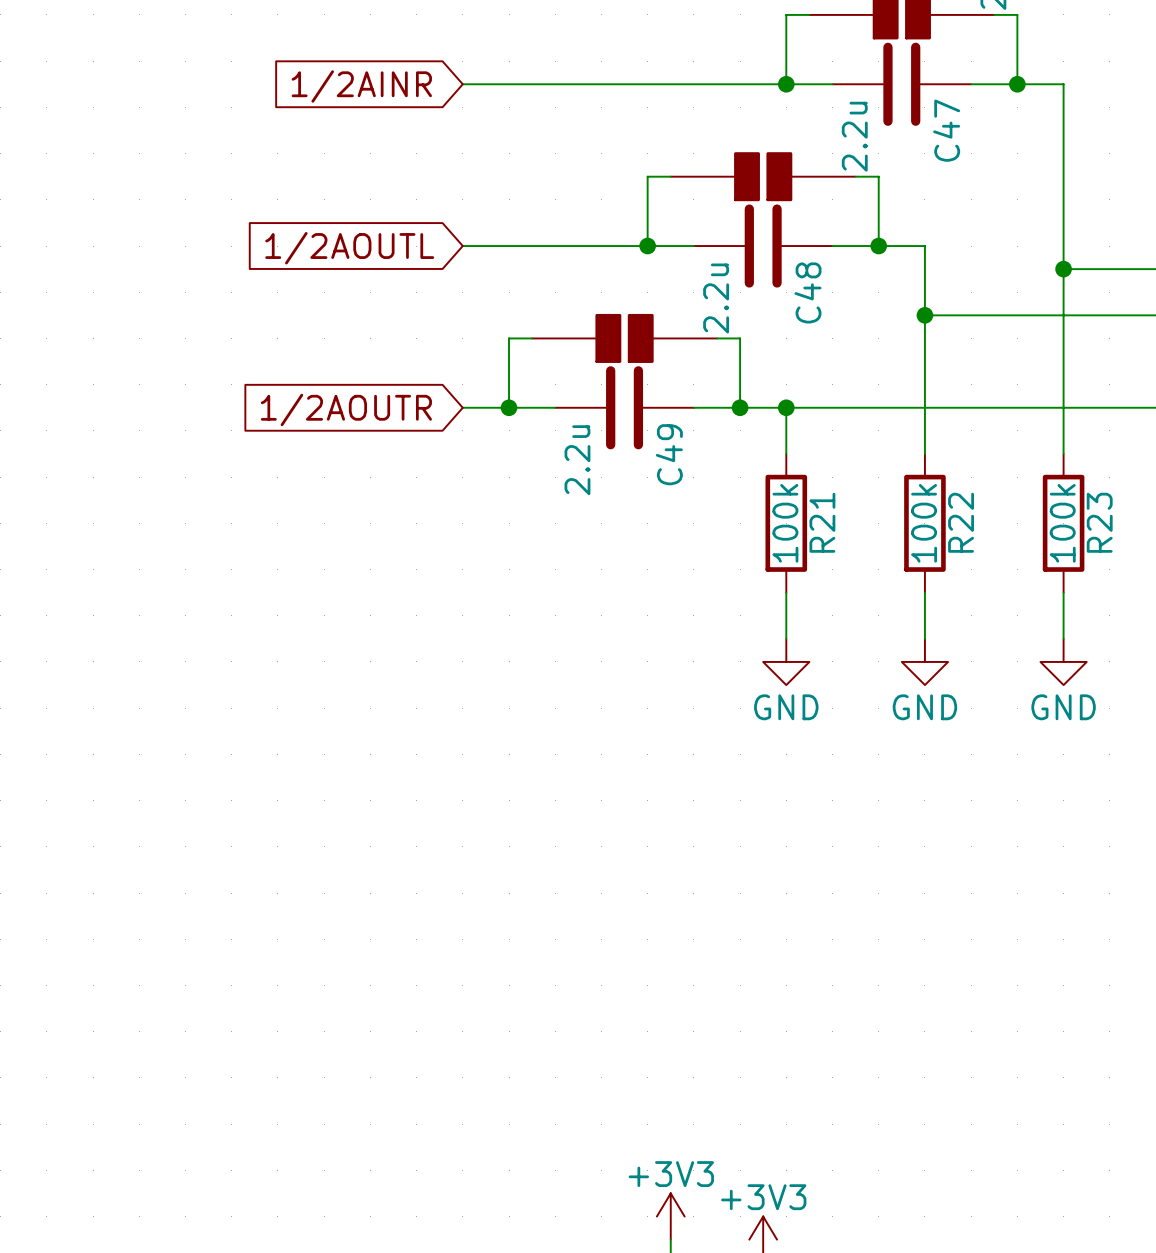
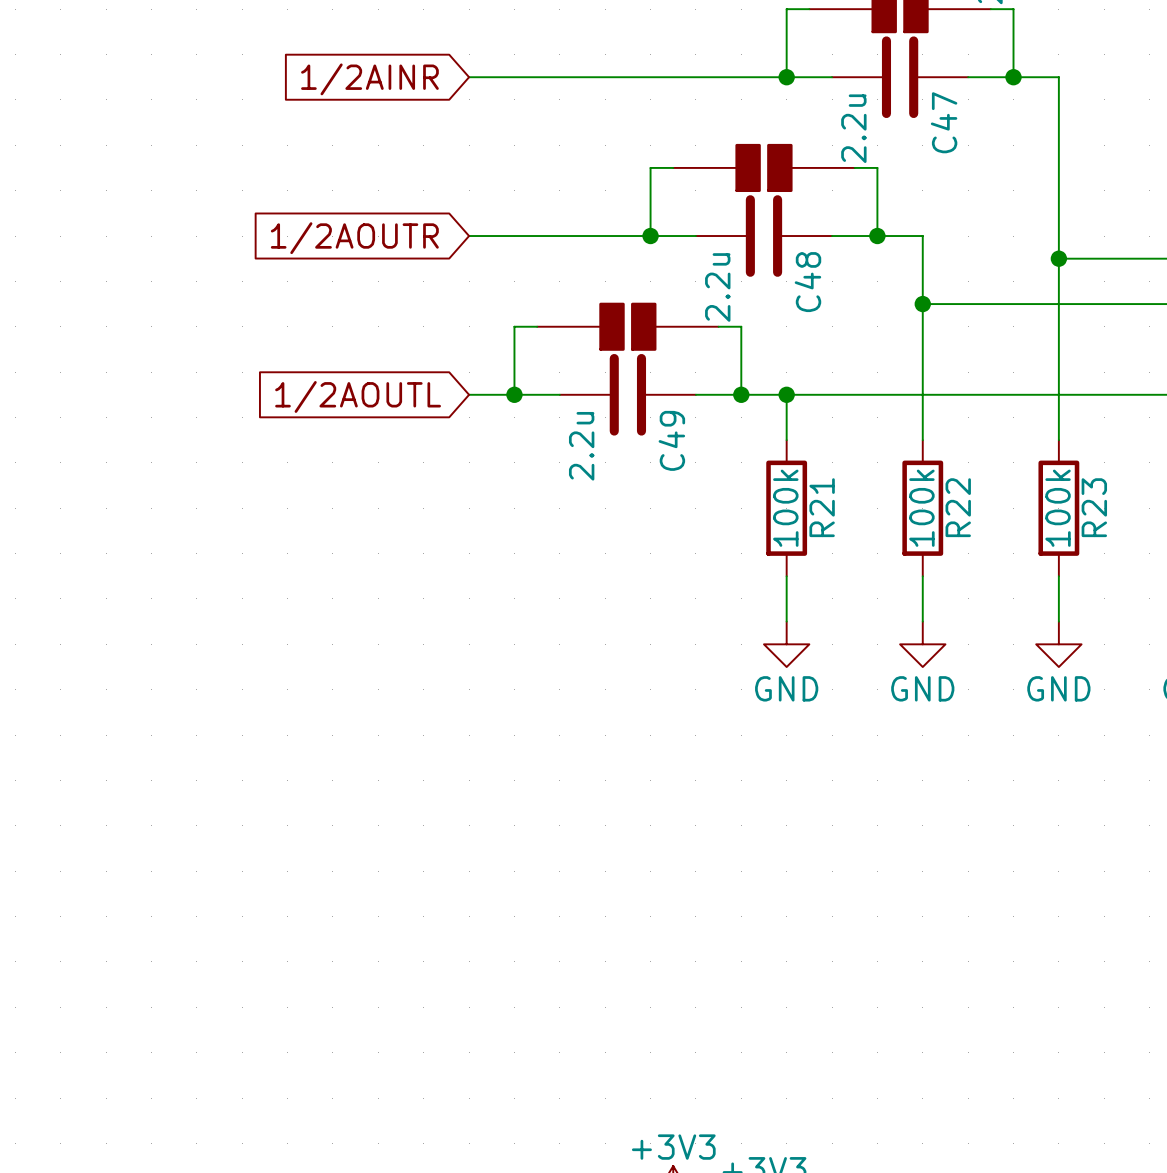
global label: 1/2AOUTL (349, 248) -> 1/2AOUTR (354, 238)
global label: 1/2AOUTR (346, 409) -> 1/2AOUTL (358, 396)

